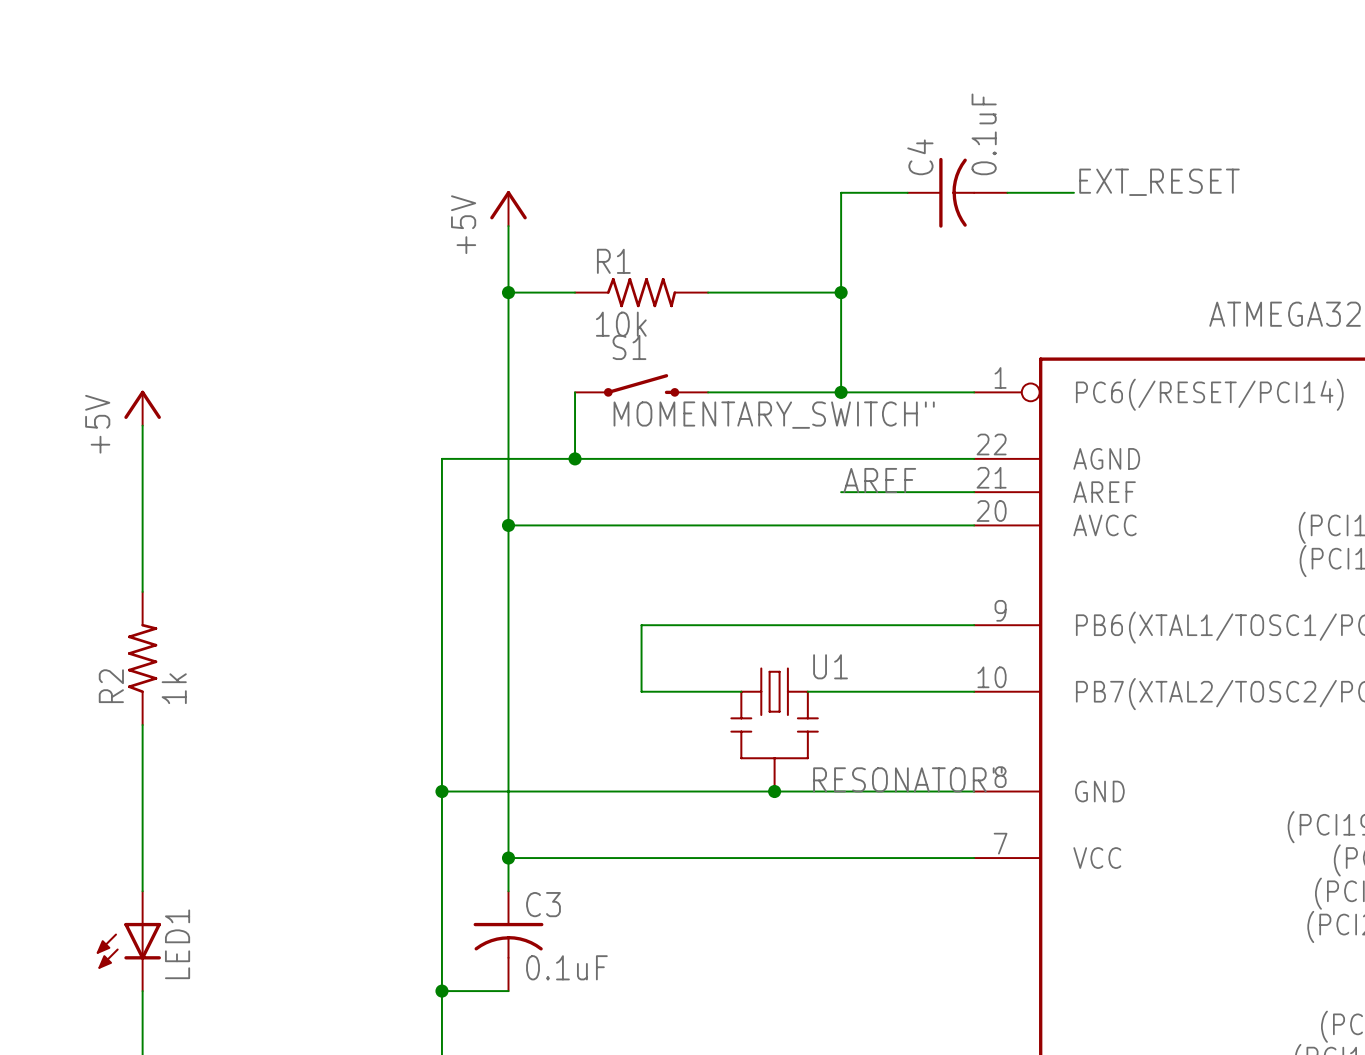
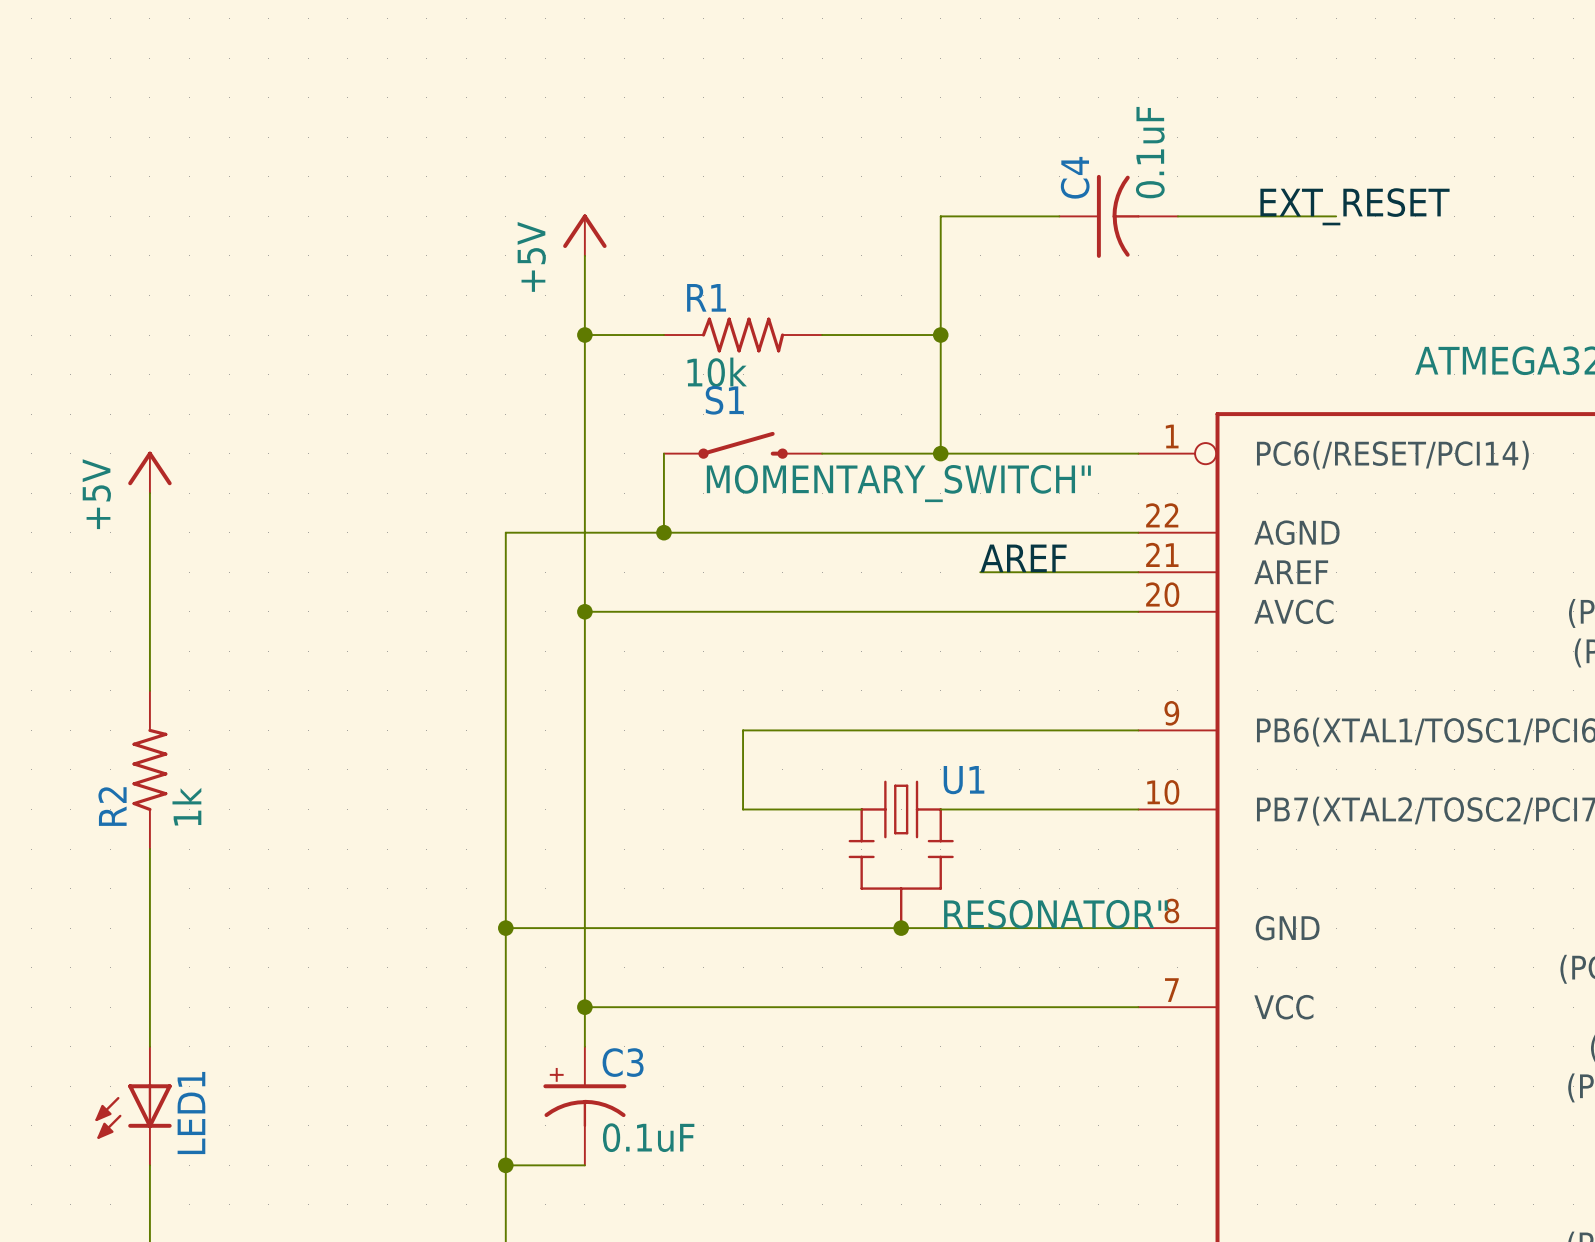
wire: (841, 192) (841, 392) -> (980, 216) (940, 216) (940, 453)
wire: none -> (1257, 216) (1336, 216)
wire: (807, 292) (841, 292) -> none
junction position: (841, 292) -> (940, 335)
junction position: (841, 392) -> (940, 453)
C3 symbol: [473, 891, 544, 992] -> [543, 1046, 627, 1166]

